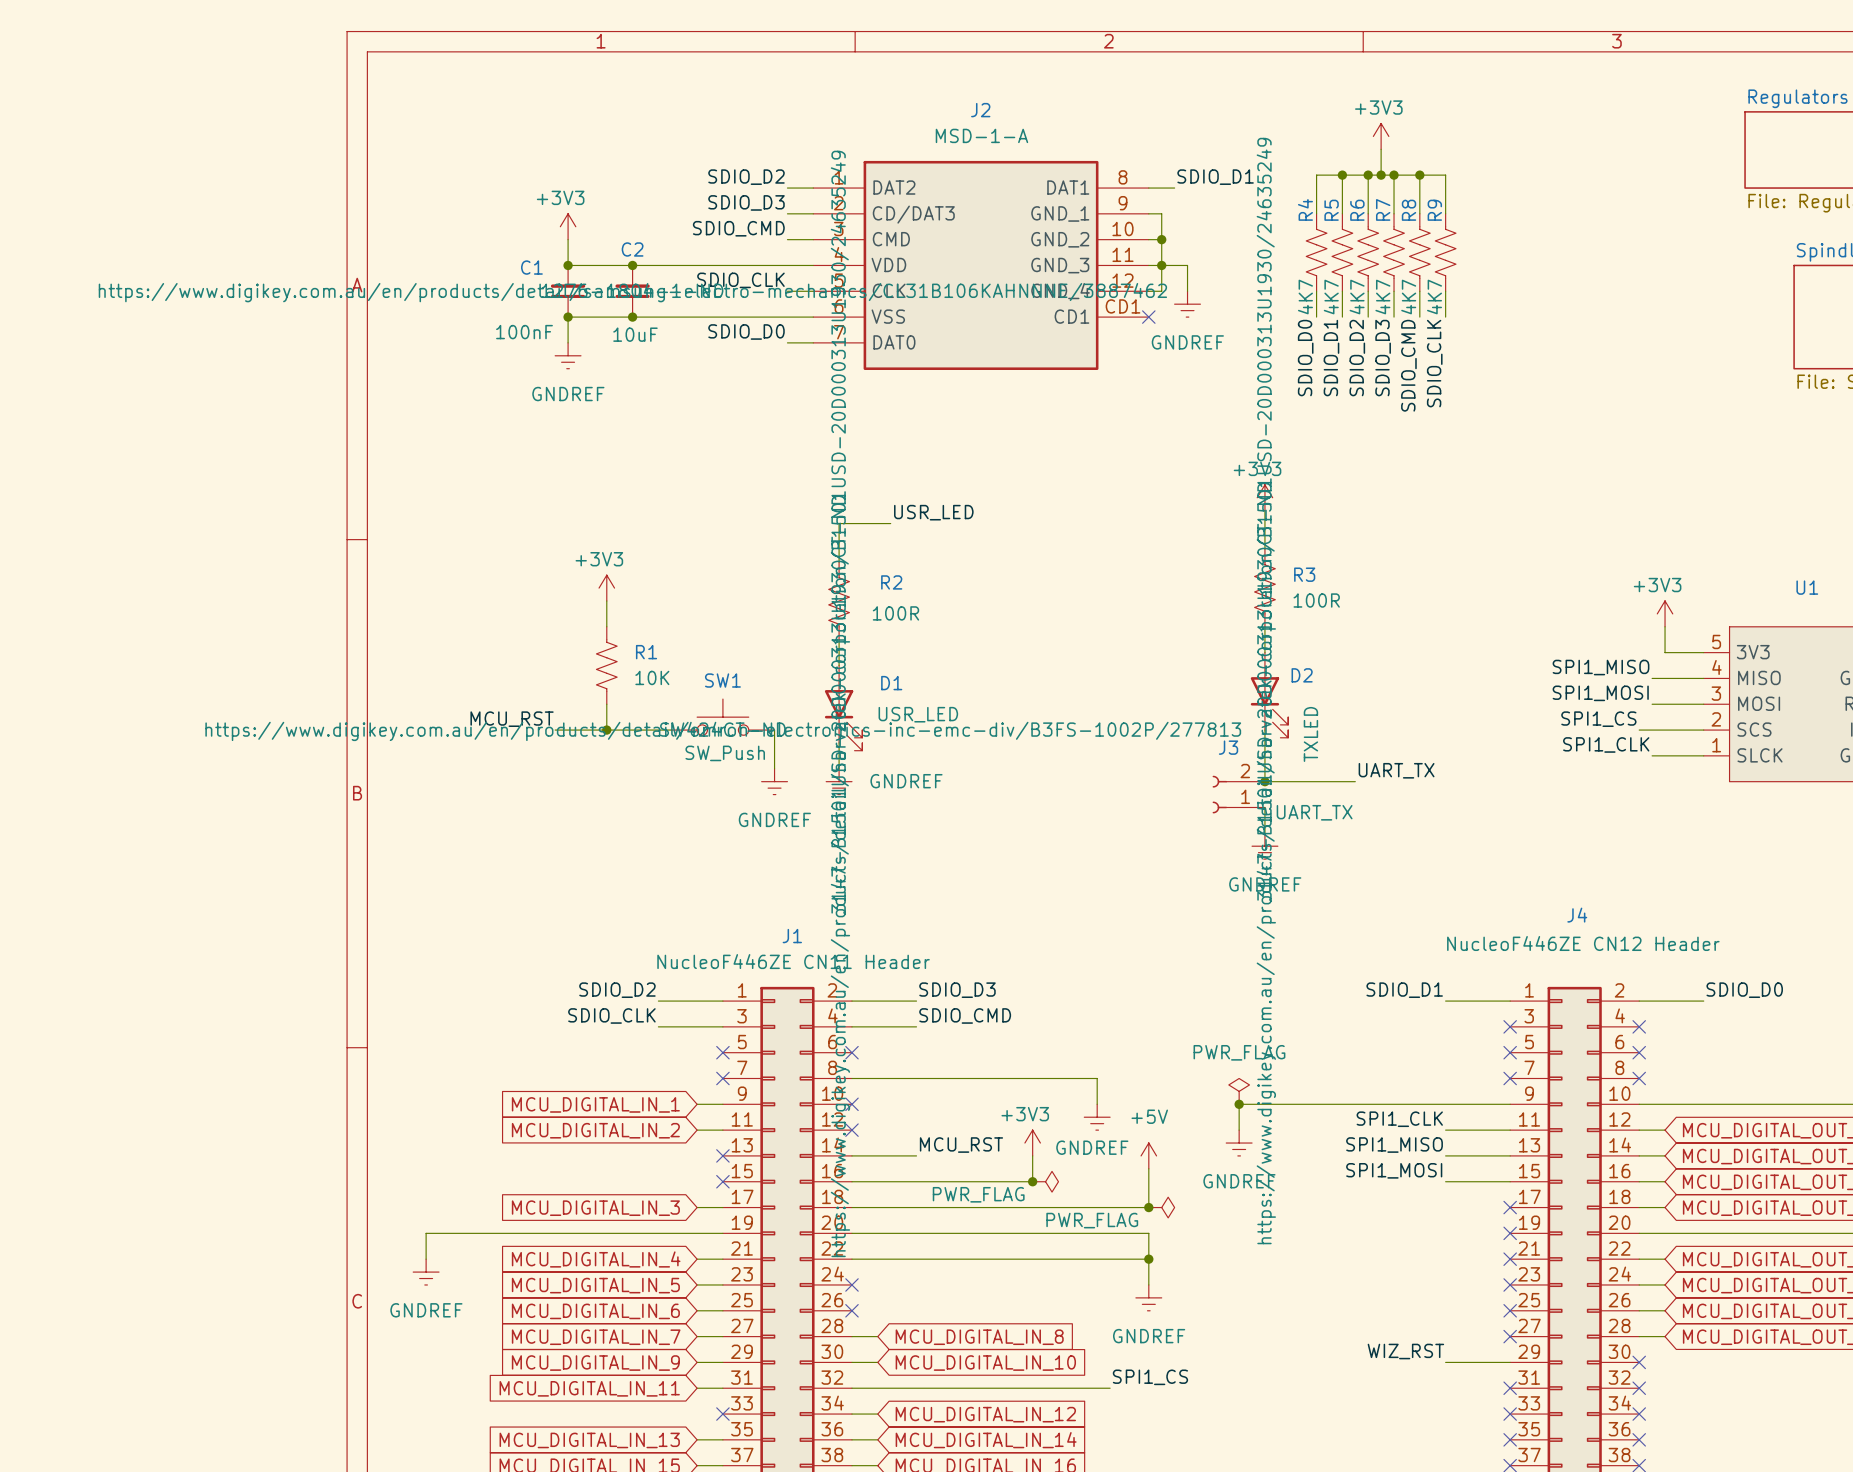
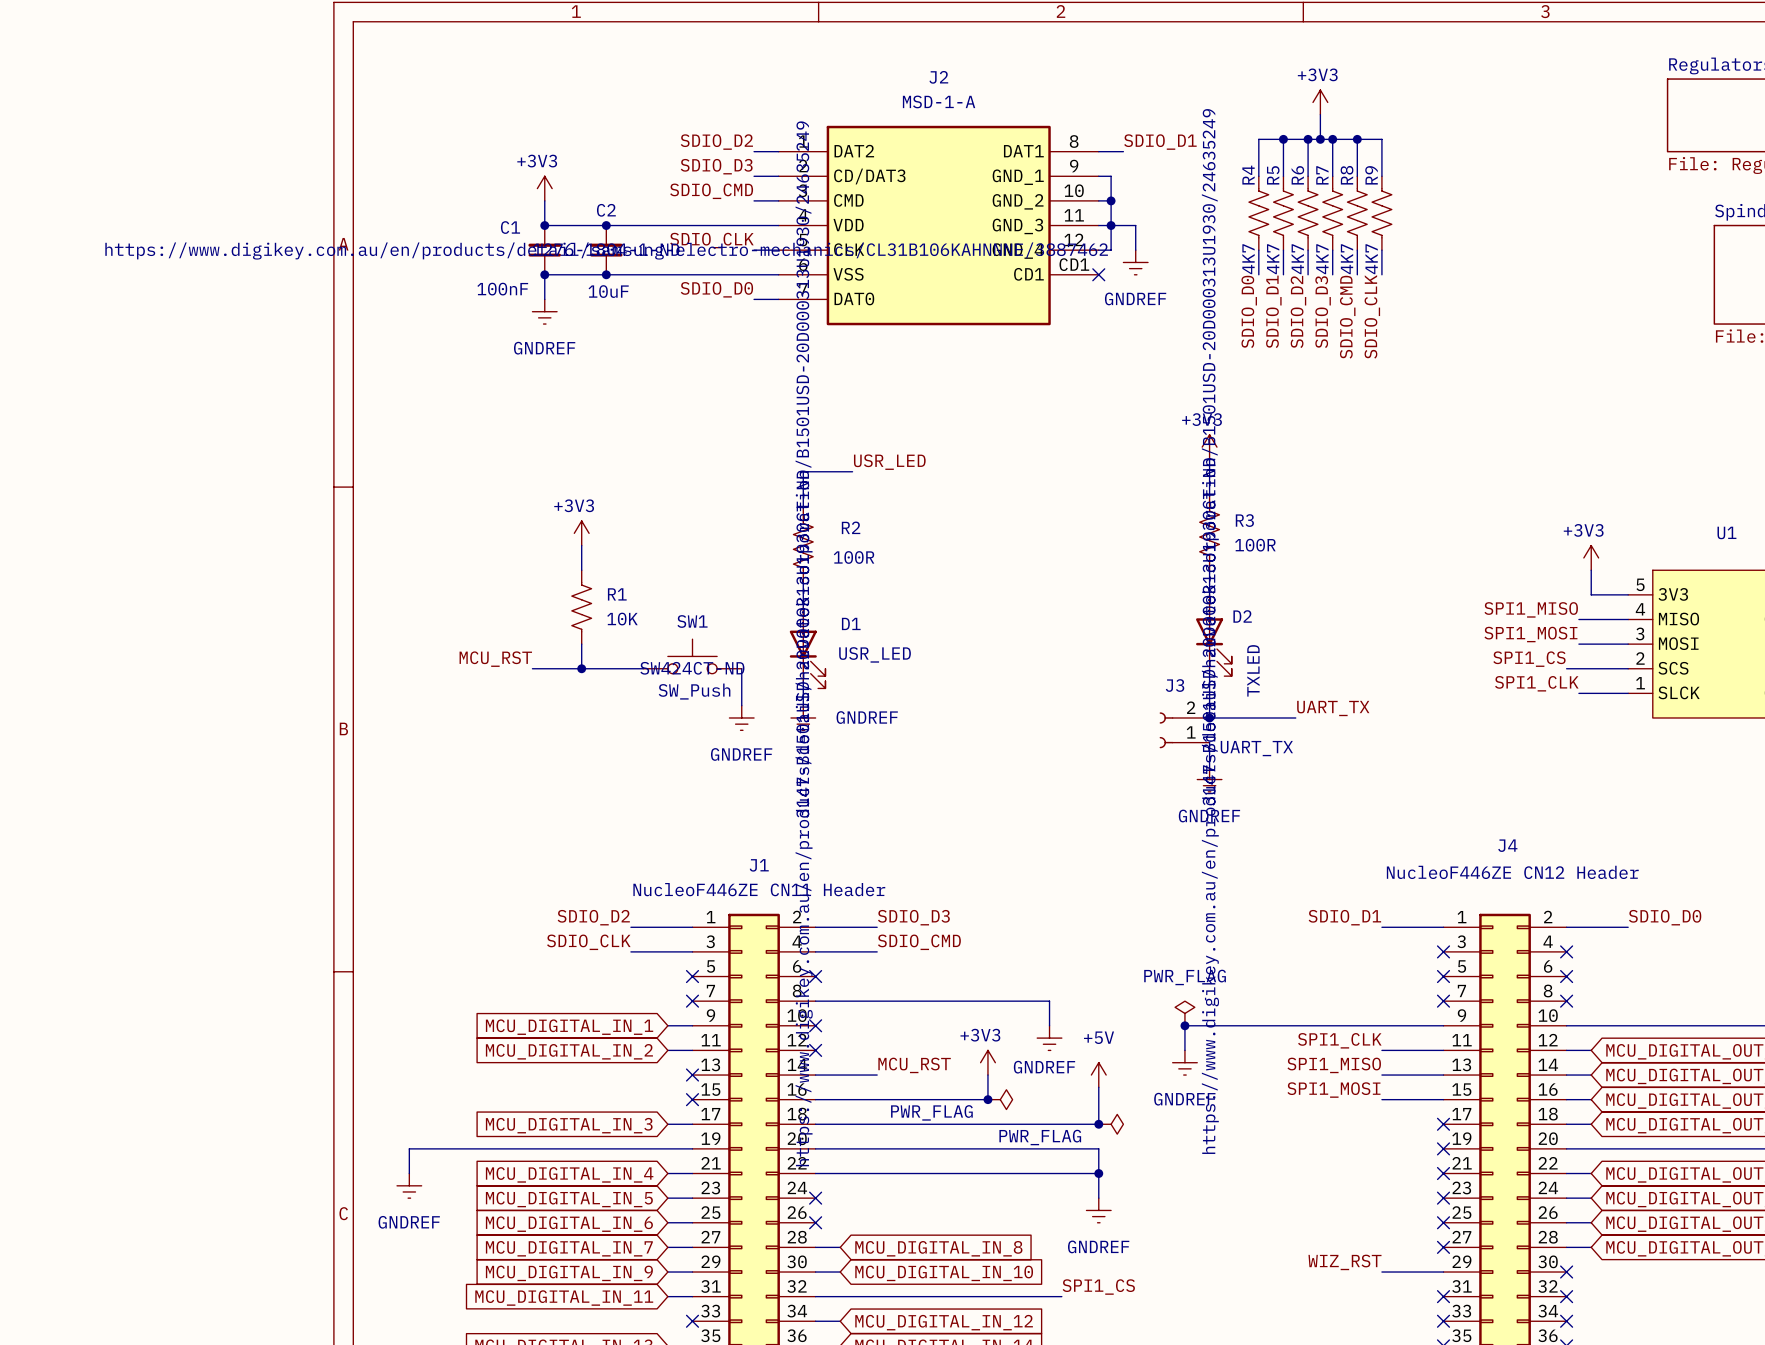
SW1 text: https://www.digikey.com.au/en/products/detail/omron-electronics-inc-emc-div/B3FS-1002P/277813 (723, 731) -> none

